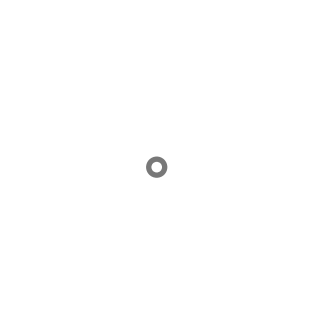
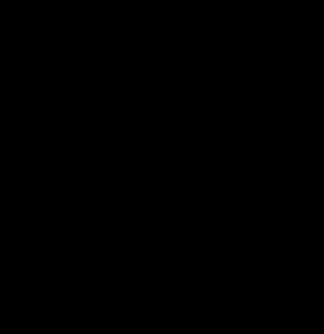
via: (156, 167) -> none

